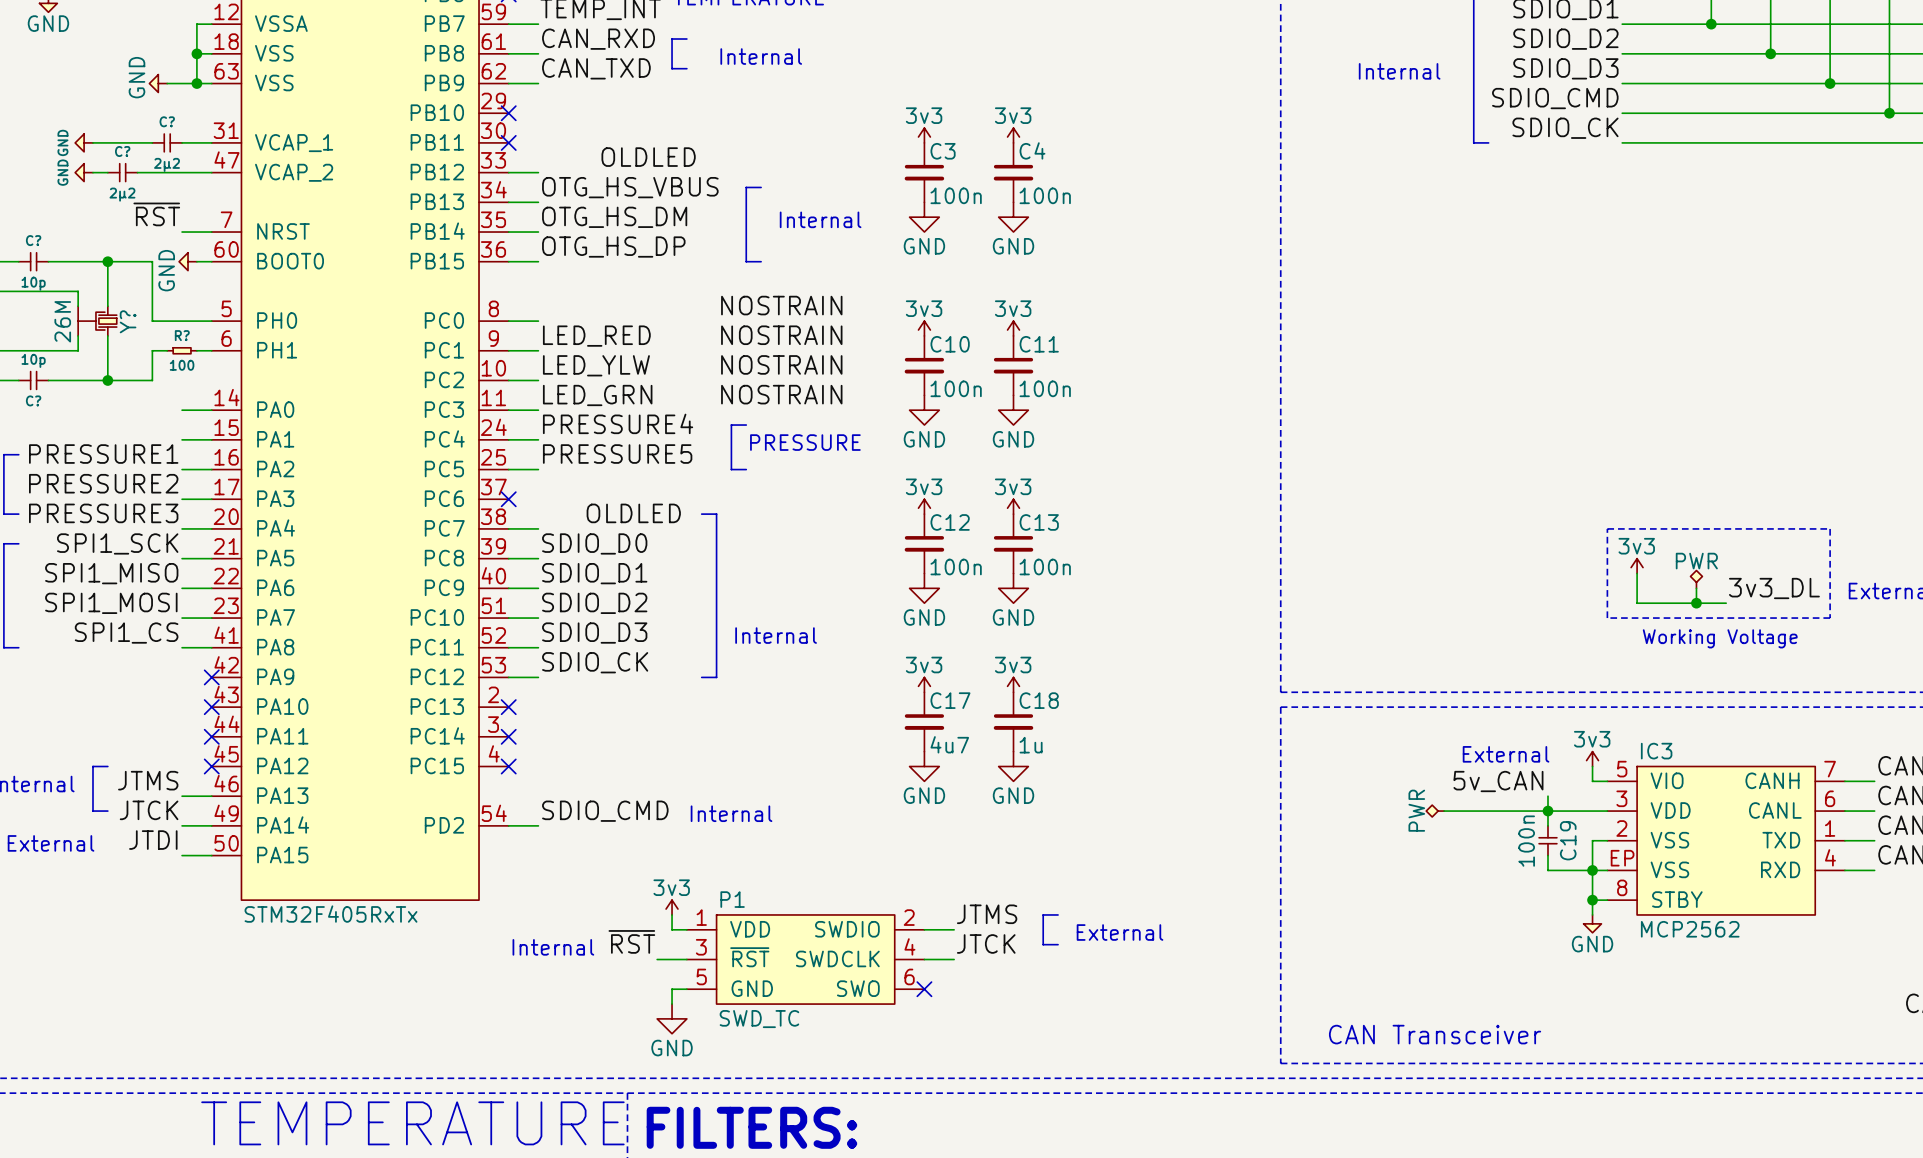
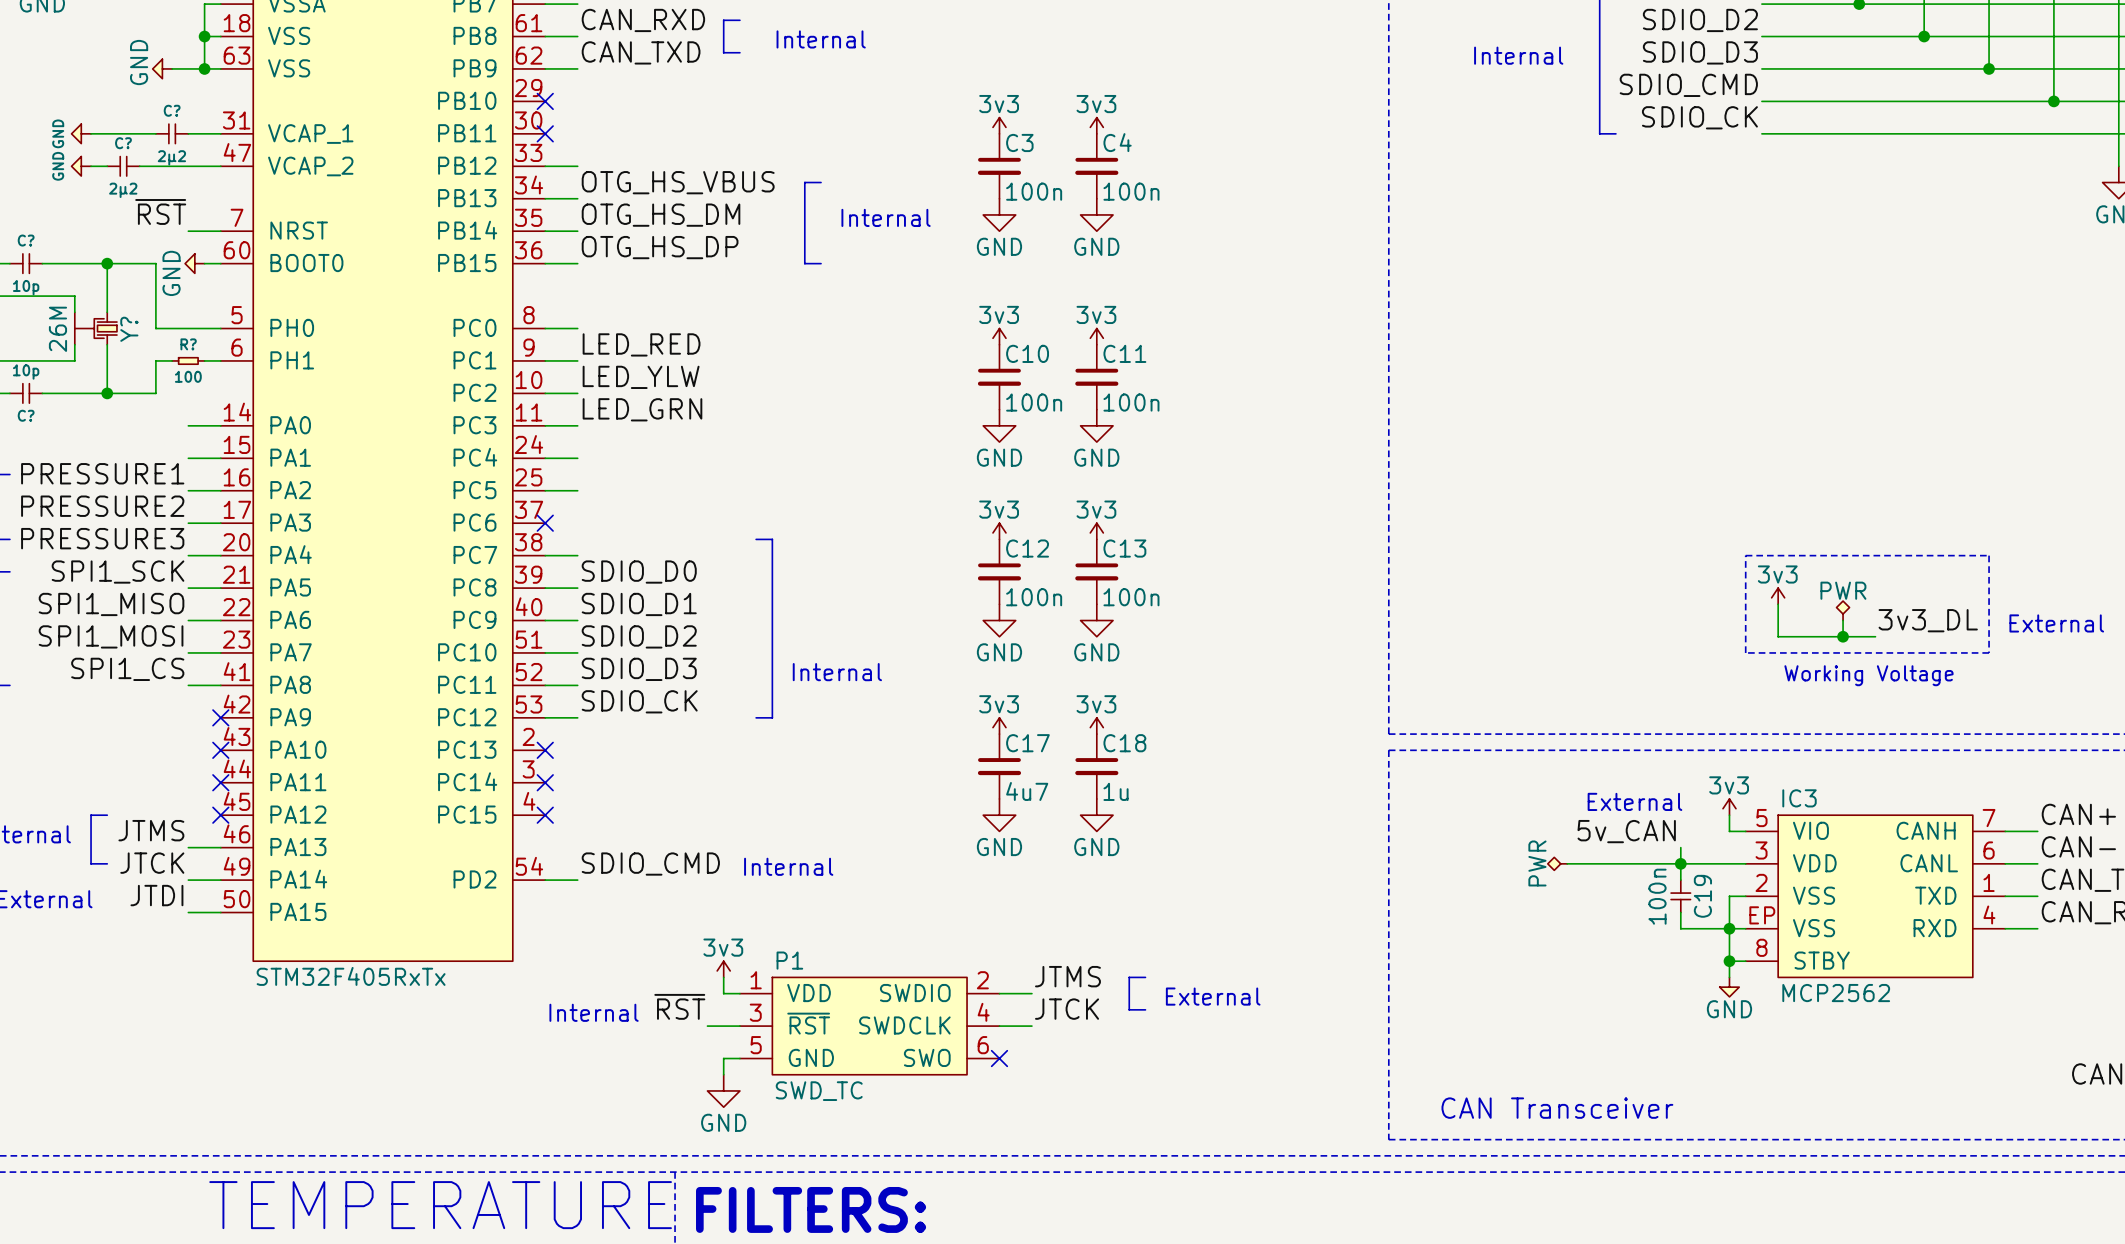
label: OLDLED (648, 157) -> none
label: NOSTRAIN (781, 305) -> none
label: NOSTRAIN (781, 335) -> none
label: NOSTRAIN (781, 364) -> none
label: NOSTRAIN (781, 394) -> none
label: PRESSURE4 (618, 423) -> none
bus: (746, 425) (731, 425) (731, 469) (746, 469) -> none
text: PRESSURE (805, 442) -> none
label: PRESSURE5 (617, 454) -> none
label: OLDLED (633, 513) -> none

